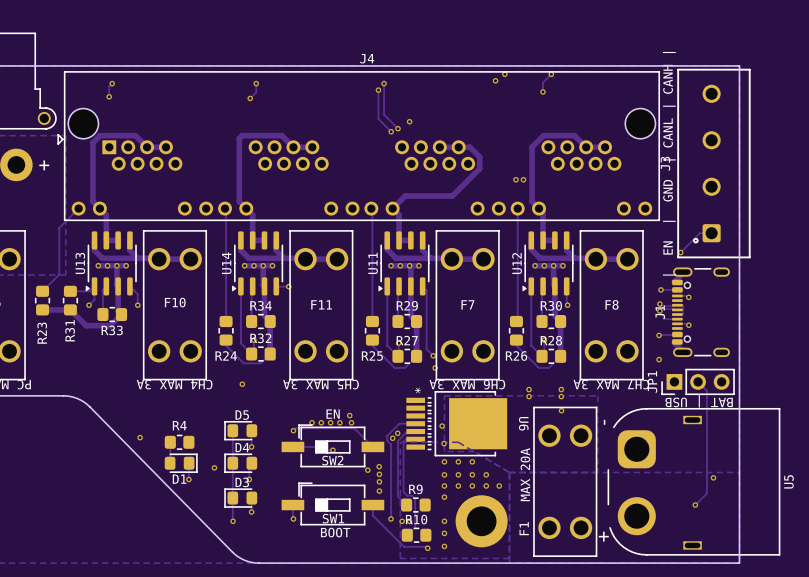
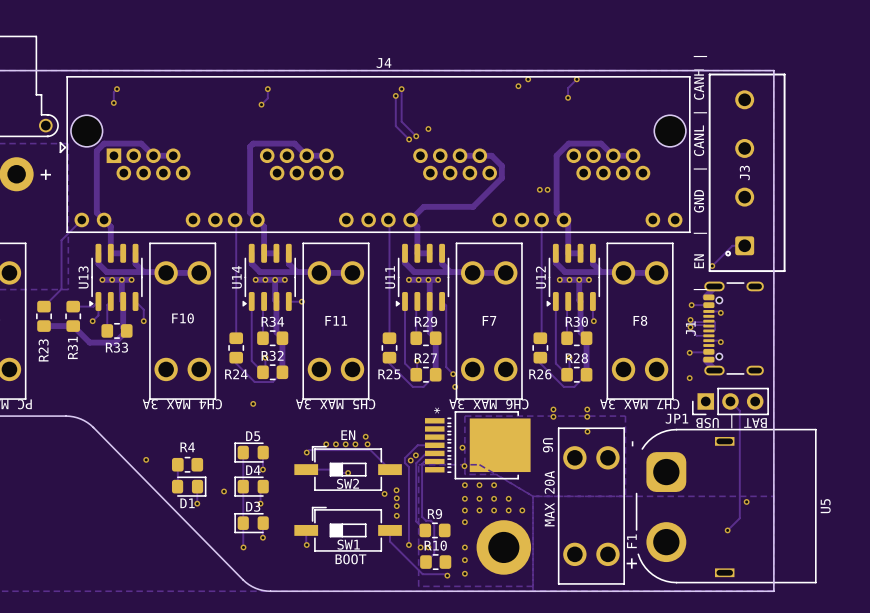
J3 name position: J3 (665, 163) -> J3 (744, 172)
JP1 name rotation: 0° (652, 382) -> 90° clockwise (676, 418)
F1 name position: F1 (524, 528) -> F1 (631, 541)

